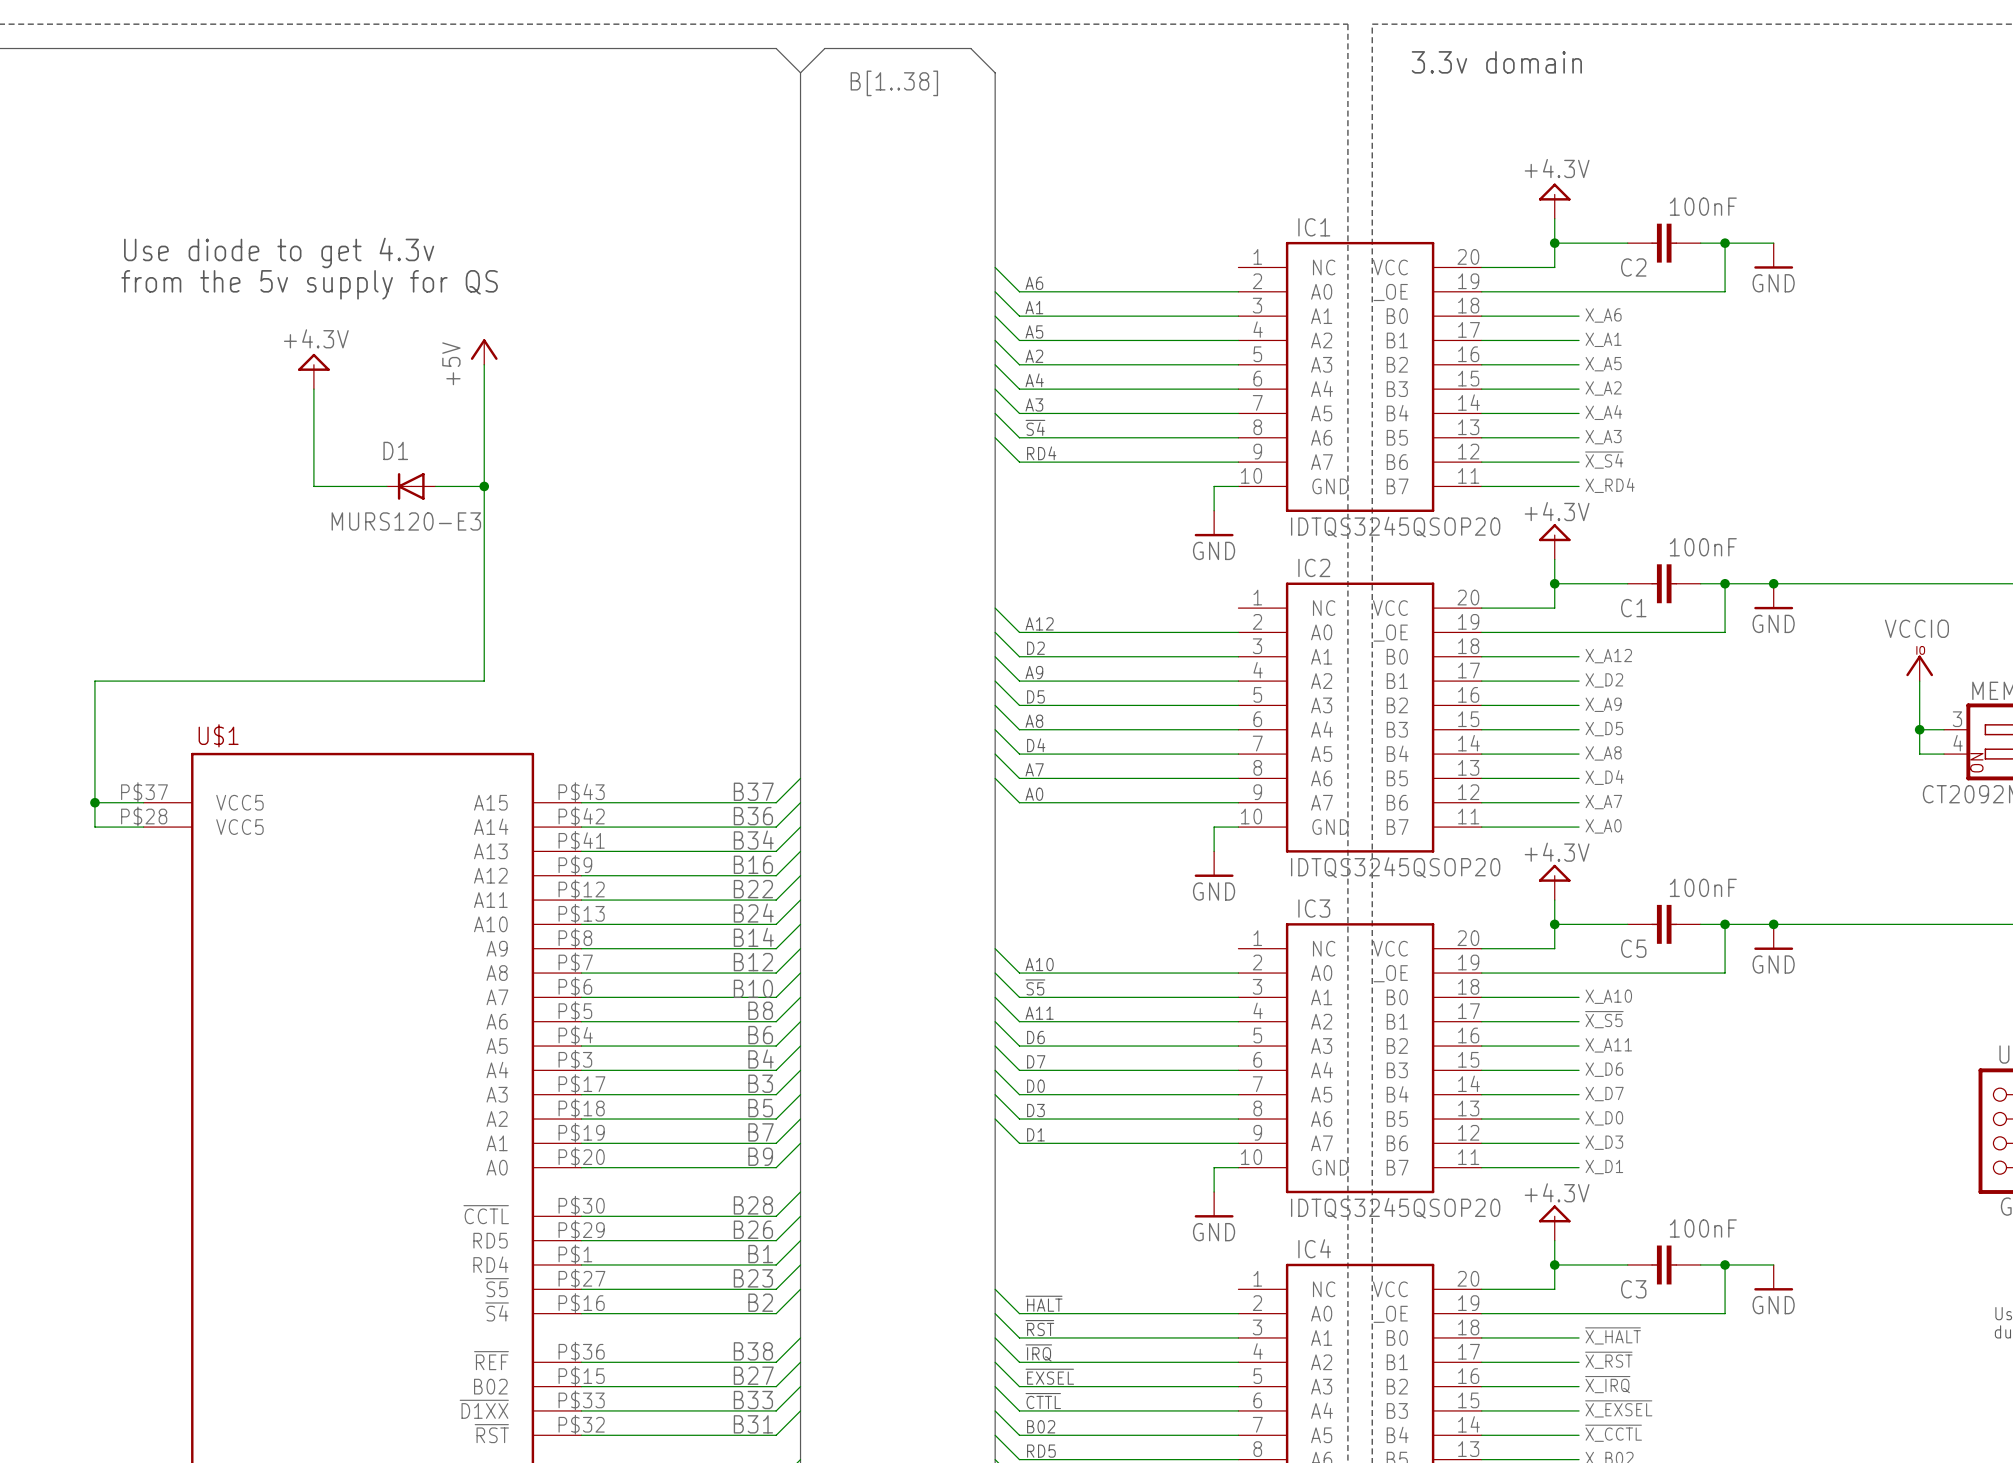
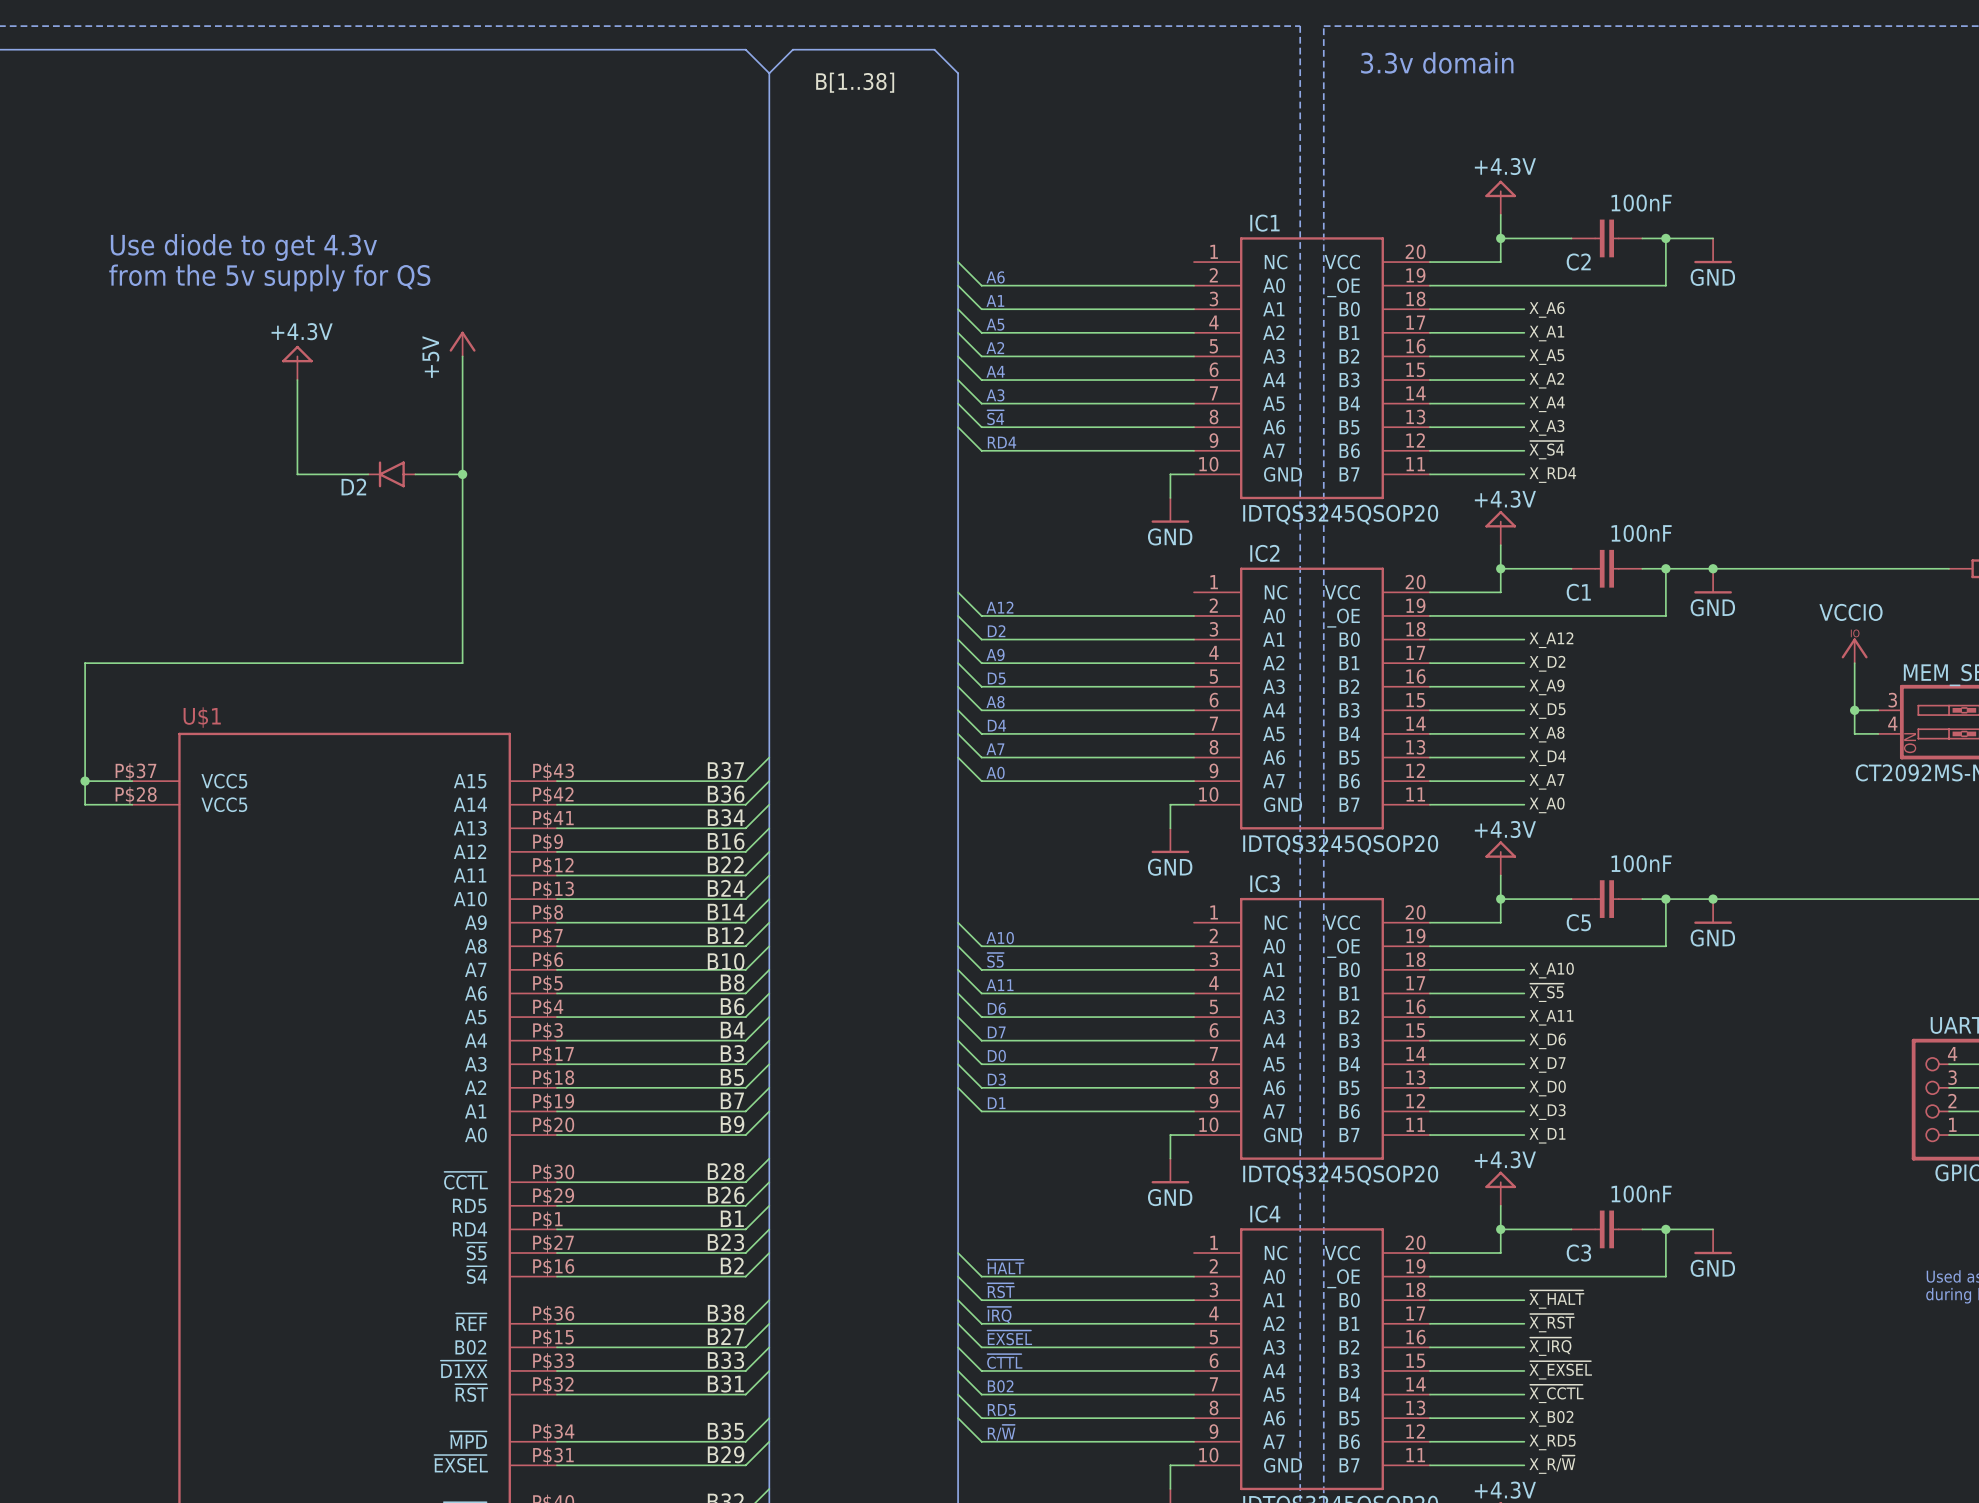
D1: MURS120-E3 (411, 486) -> none
D2: none -> (391, 474)

